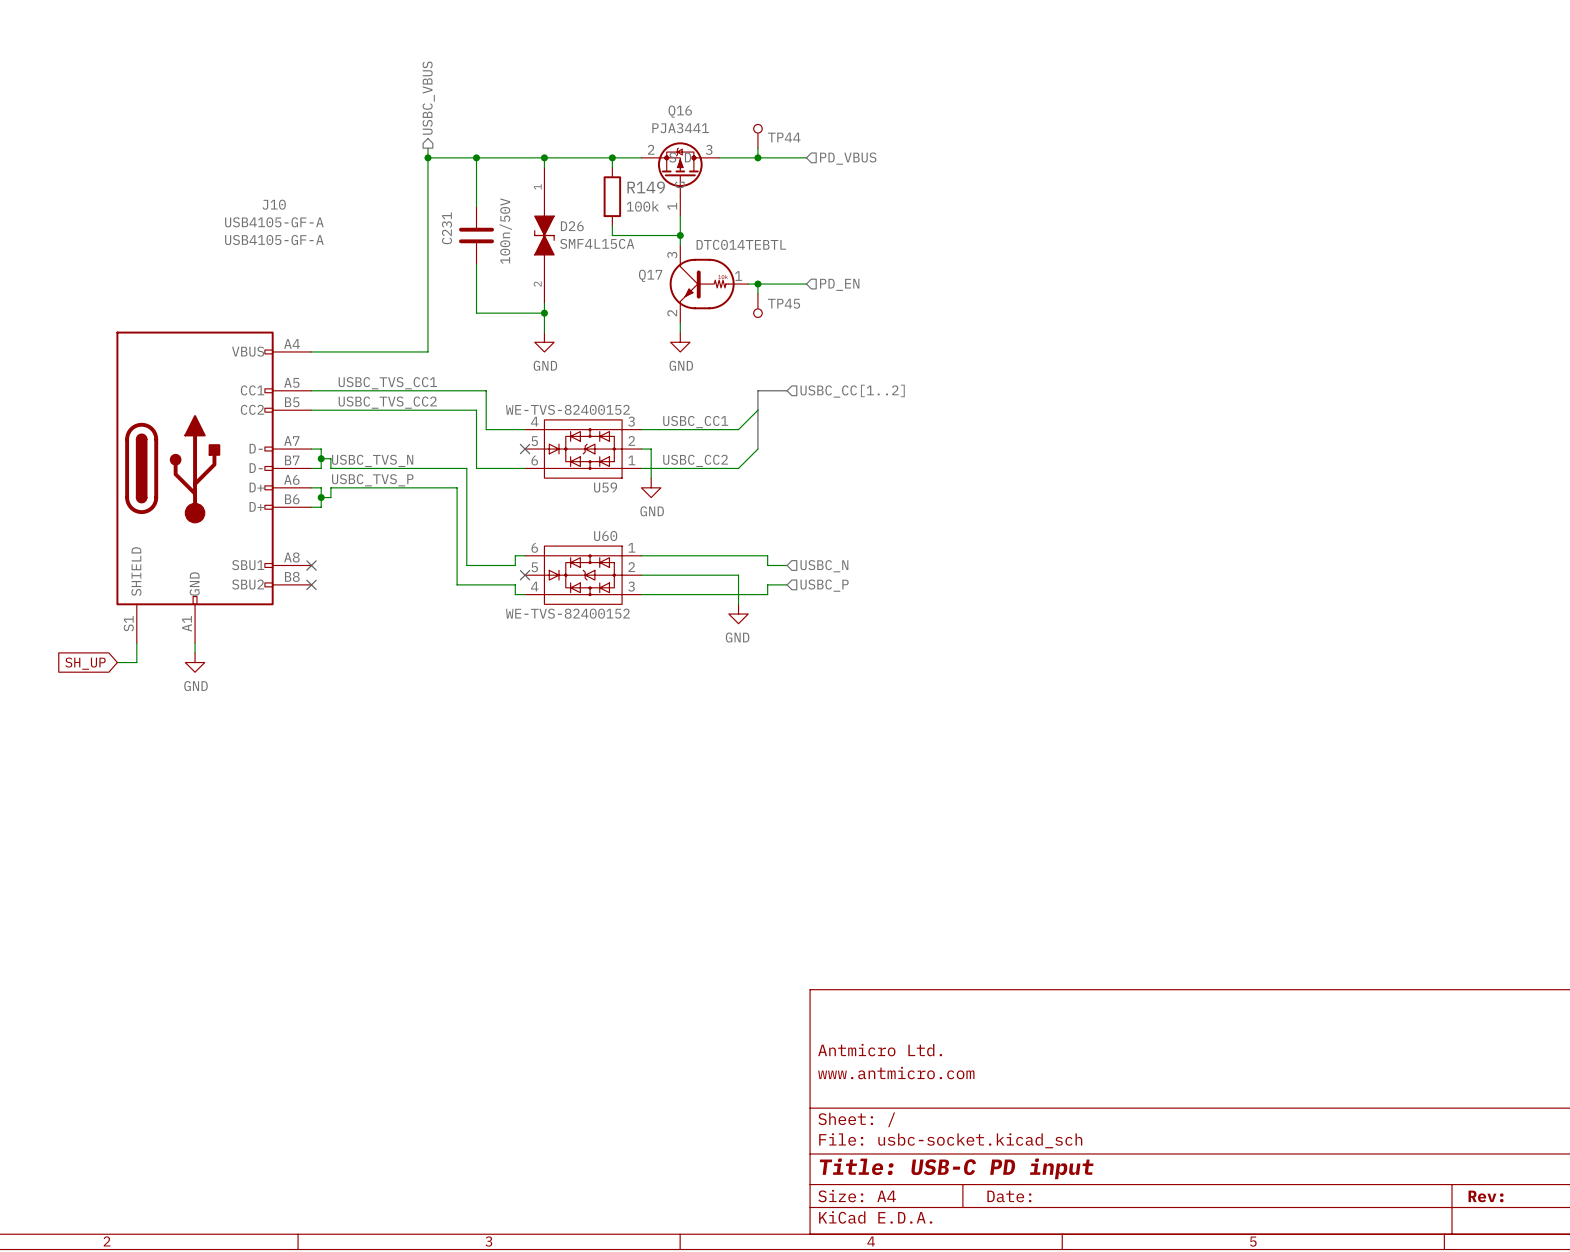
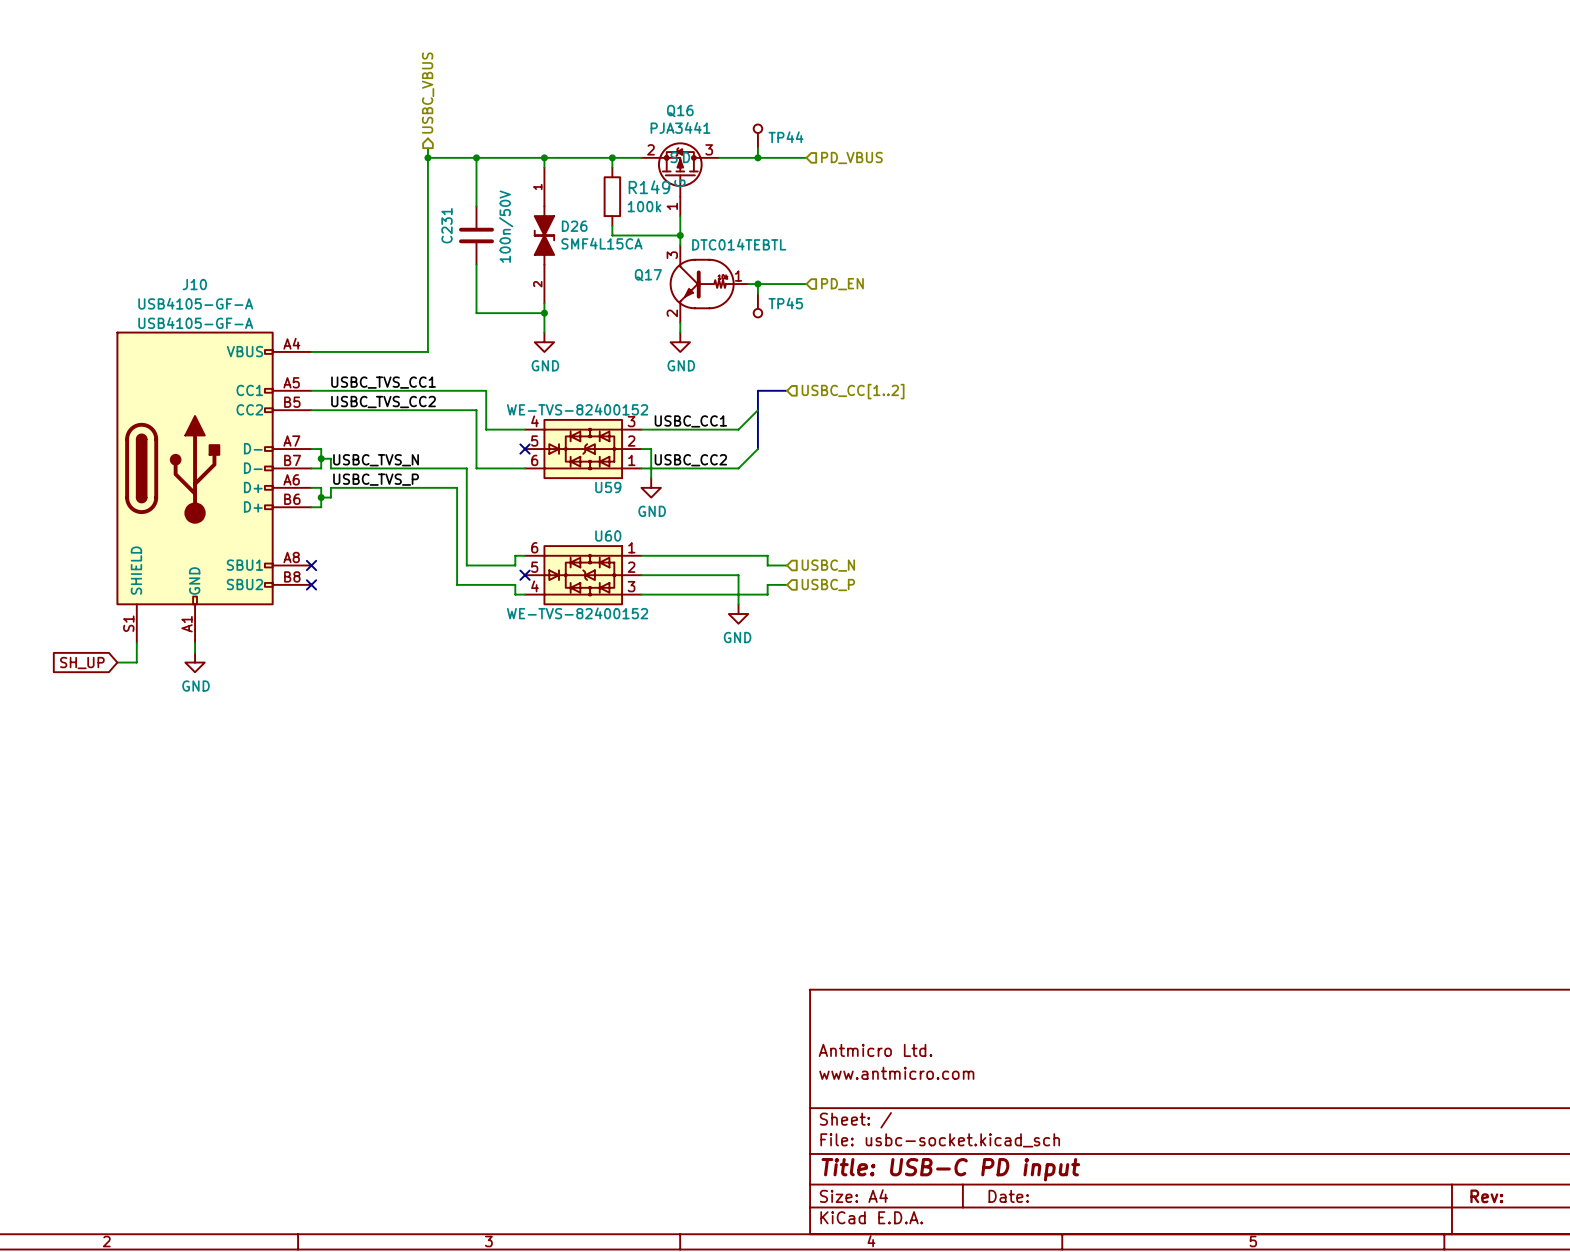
J10 name position: J10 (274, 204) -> J10 (194, 284)
J10 value position: USB4105-GF-A (274, 222) -> USB4105-GF-A (195, 303)
J10 text position: USB4105-GF-A (274, 240) -> USB4105-GF-A (195, 323)

